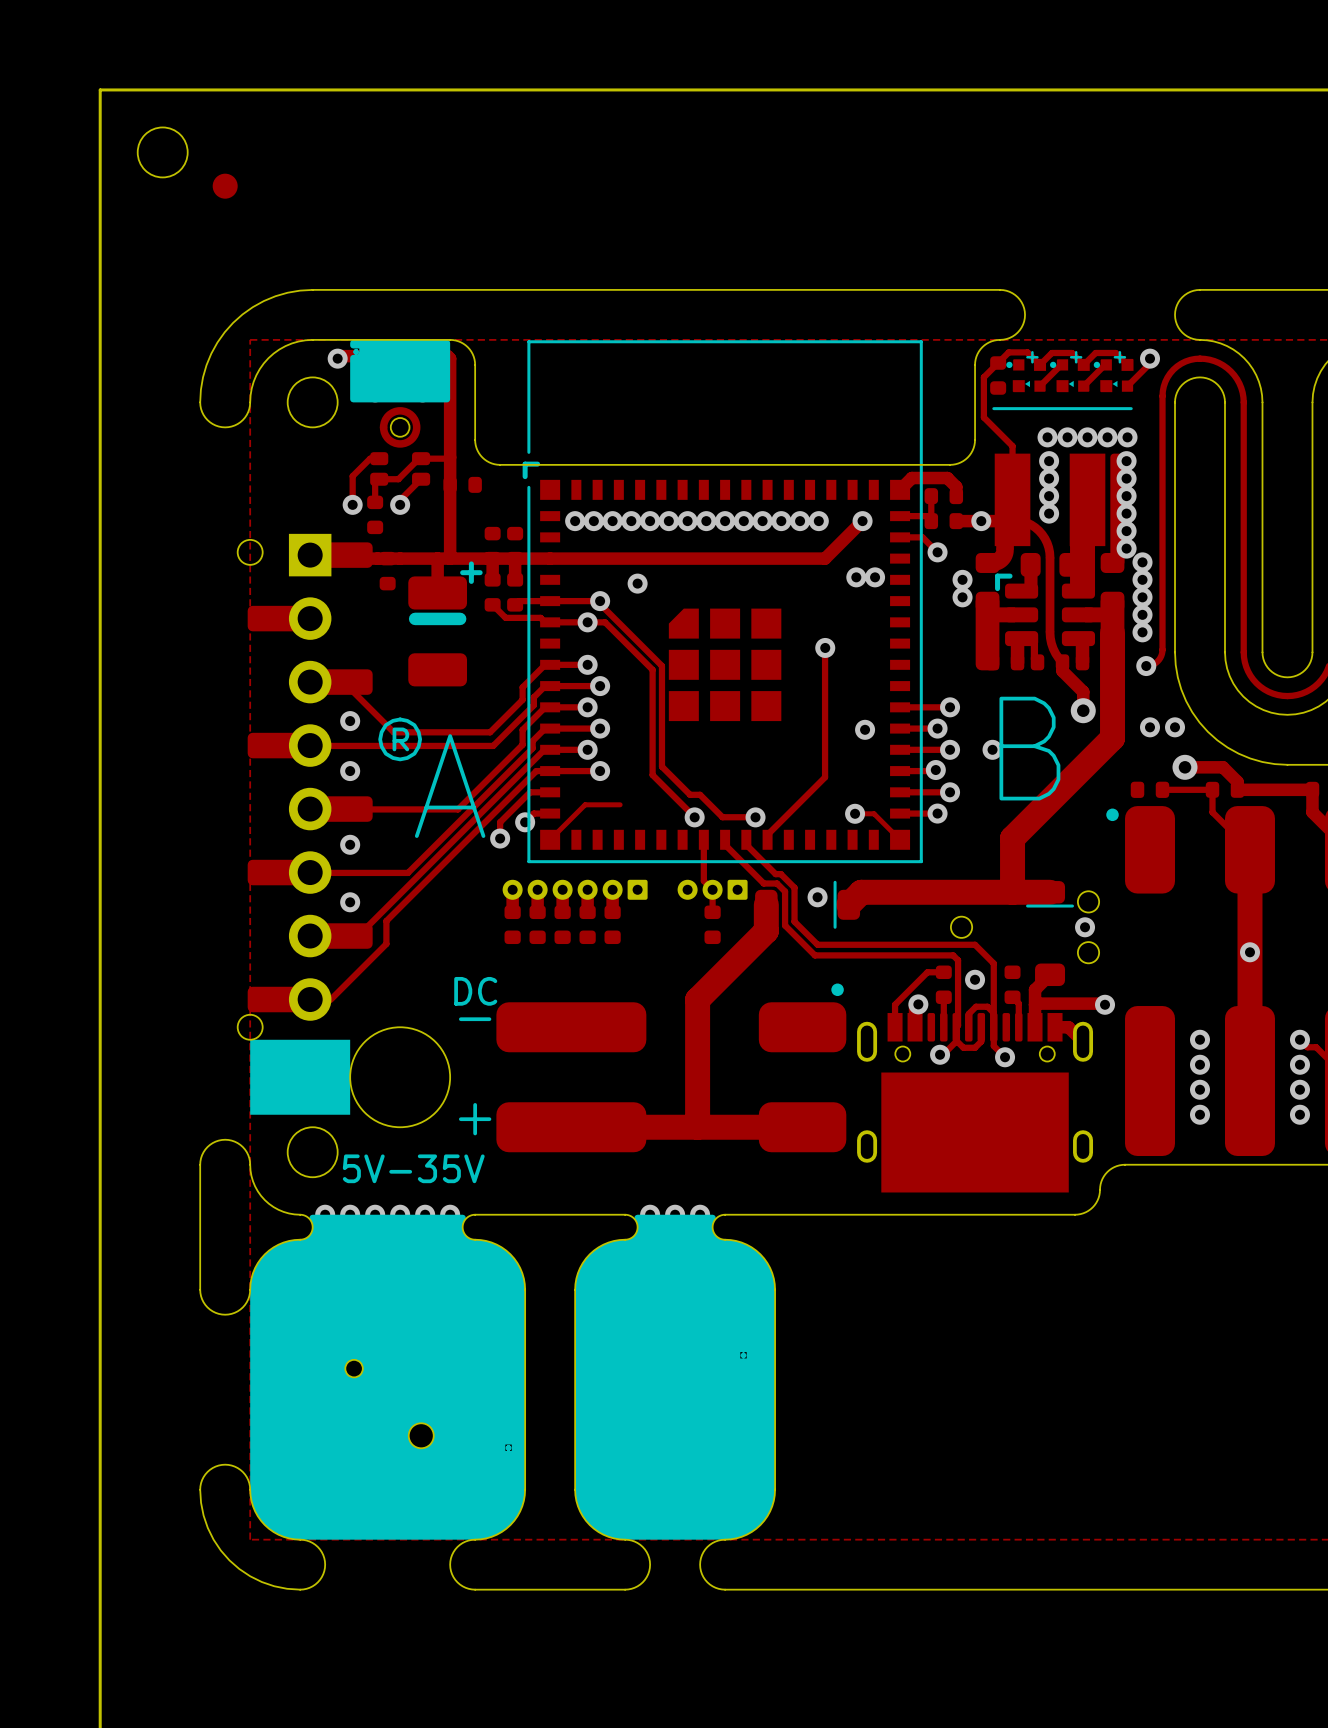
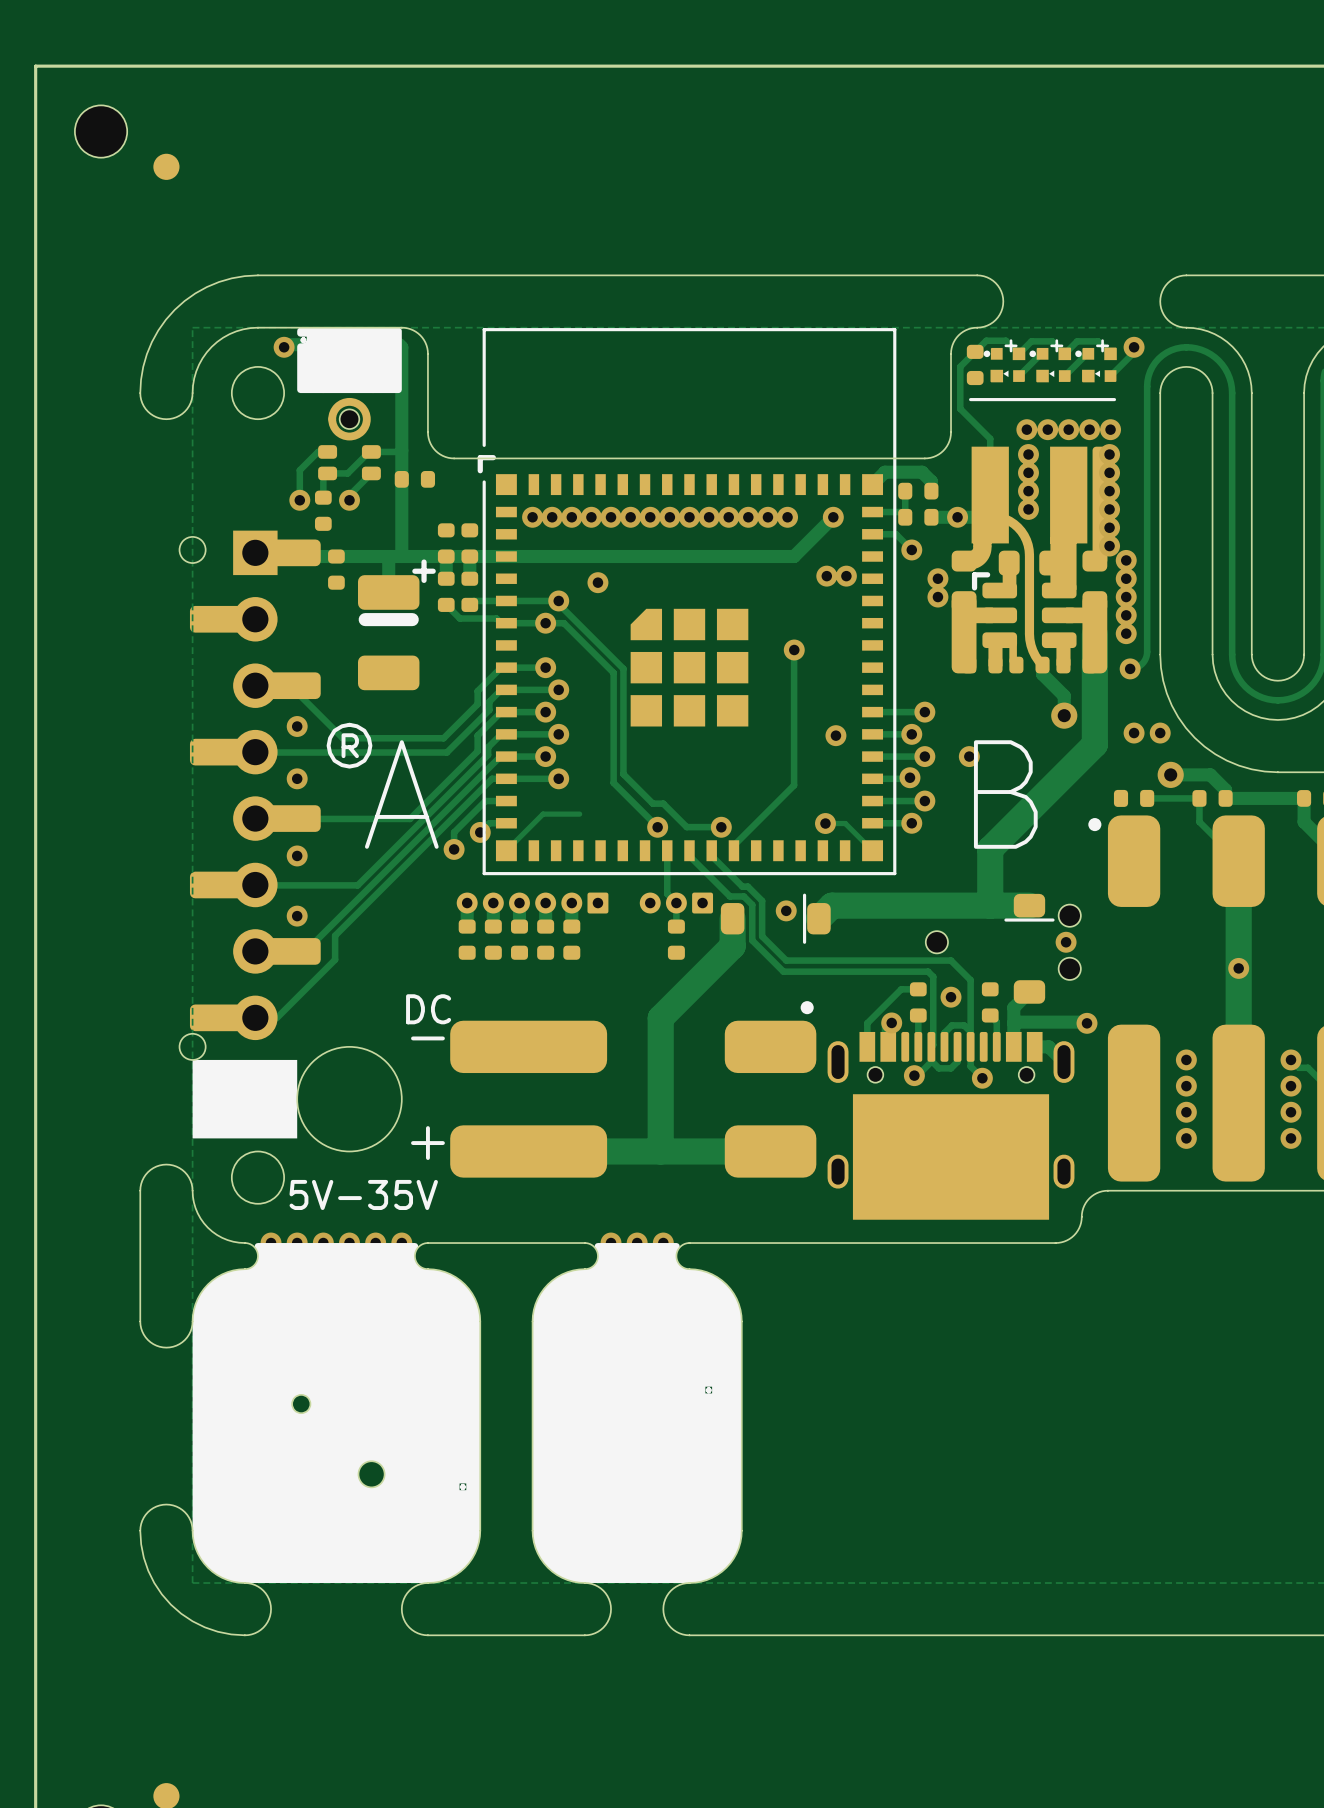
text position: B (1029, 748) -> B (1005, 794)

